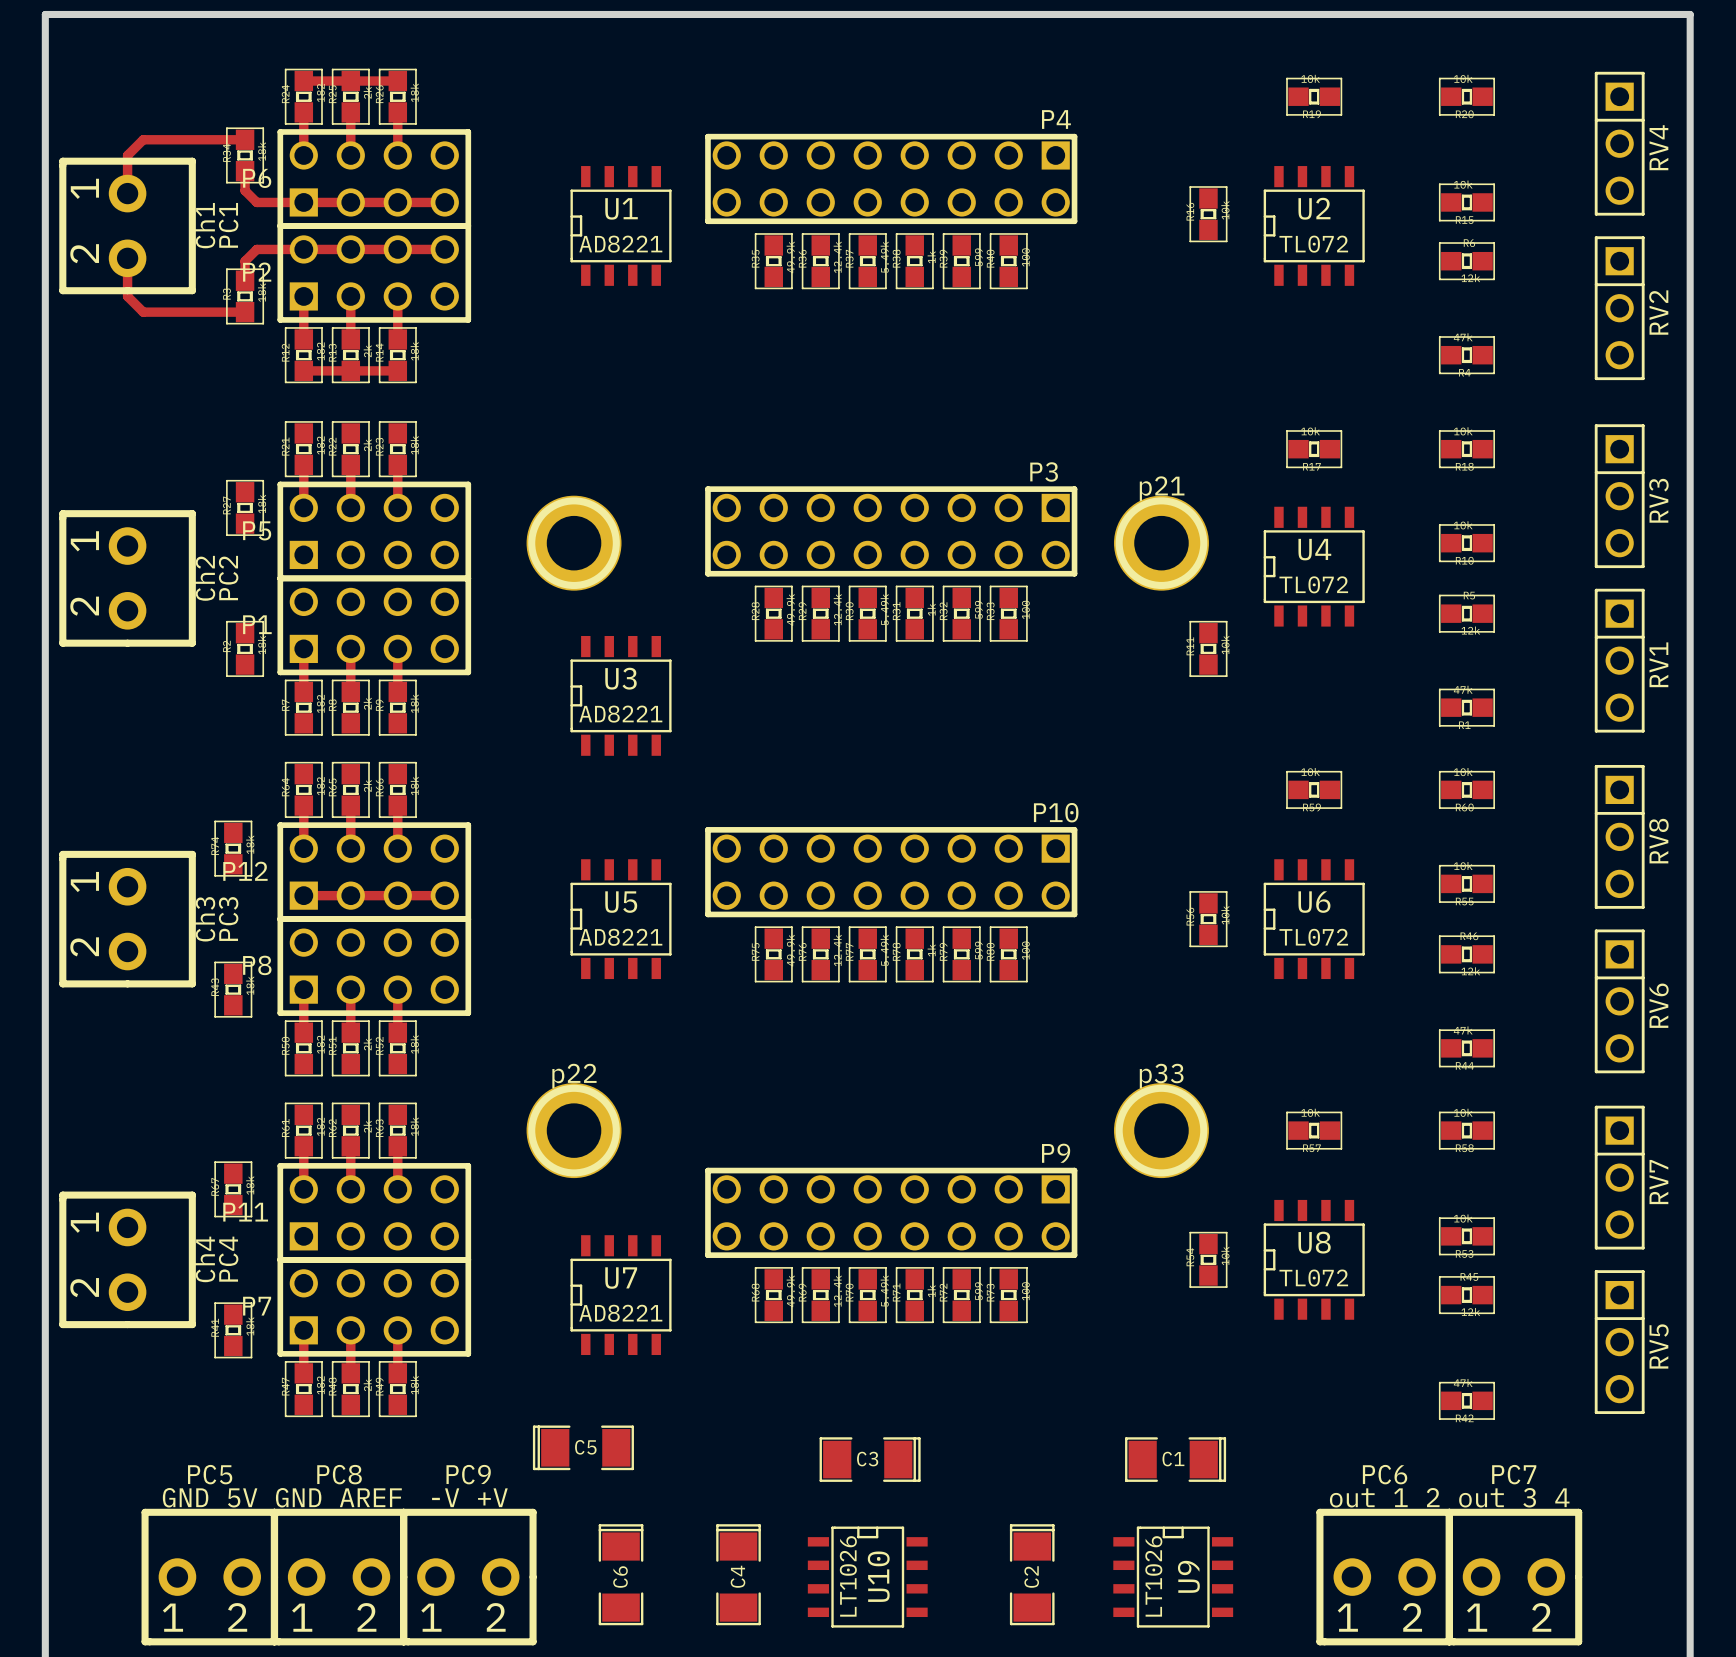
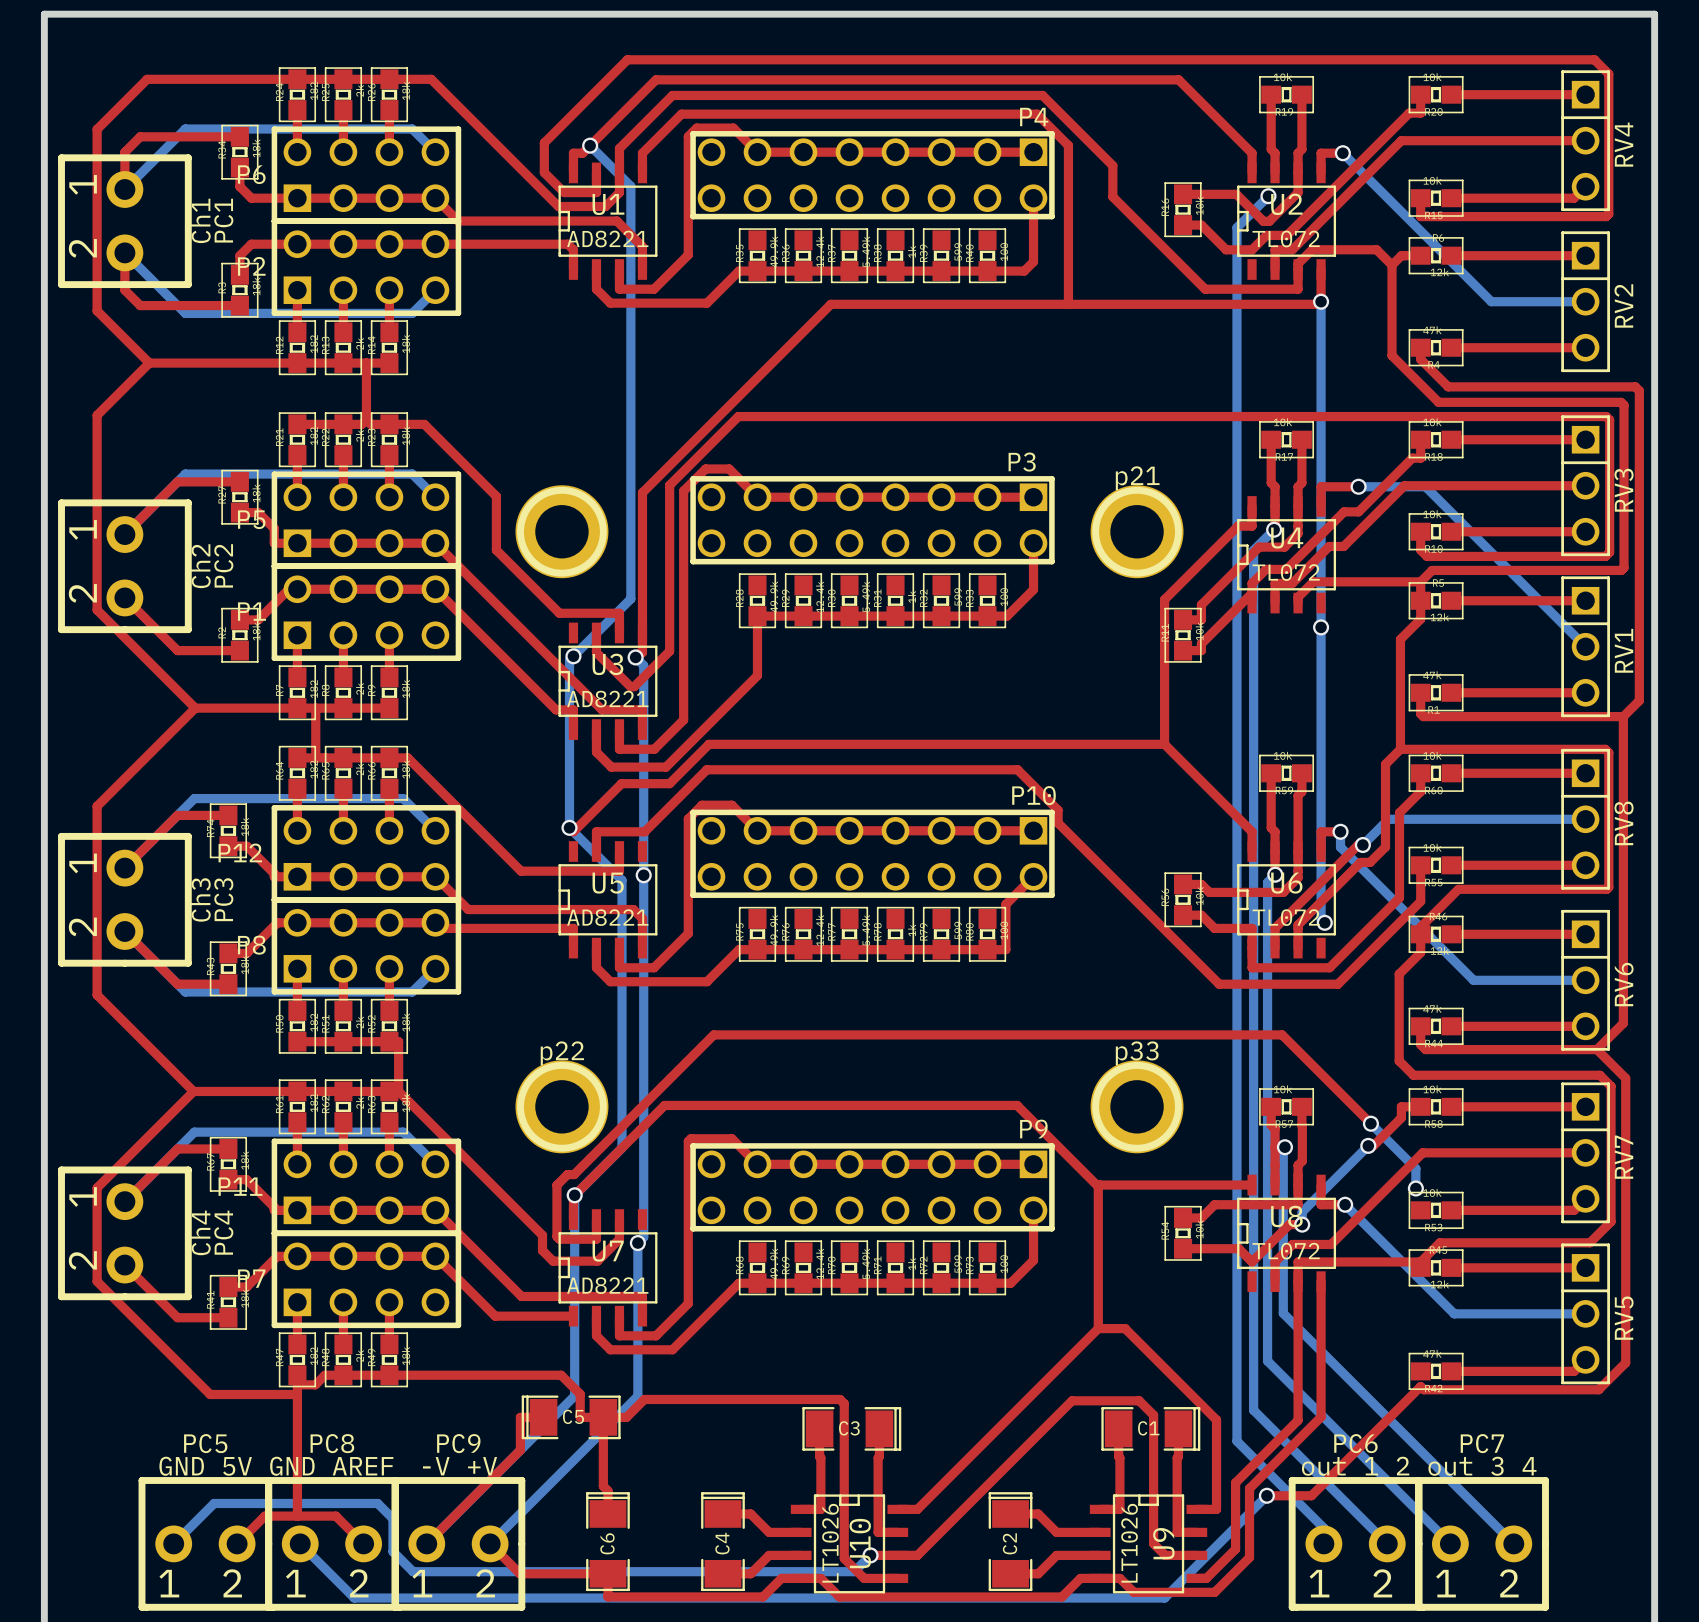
top track: none -> (297, 79) (147, 79) (97, 129) (97, 310) (149, 363)
top track: none -> (389, 79) (431, 79) (558, 206) (605, 206) (619, 192) (619, 148) (672, 95) (1042, 95) (1112, 165) (1112, 196) (1205, 289) (1298, 289) (1298, 263) (1312, 249) (1376, 249) (1392, 265)
top track: none -> (1271, 94) (1271, 149) (1275, 153) (1275, 172)
top track: none -> (1301, 94) (1301, 149) (1298, 153) (1298, 192) (1269, 221) (1263, 221) (1236, 194) (1183, 194)
top track: none -> (1420, 94) (1420, 113) (1409, 113) (1287, 235) (1266, 235) (1252, 249) (1226, 249) (1201, 225) (1183, 225)
top track: none -> (1451, 94) (1585, 94)
top track: none -> (1585, 140) (1401, 140) (1292, 249) (1275, 249) (1275, 269)
bottom track: none -> (590, 145) (630, 186) (630, 598) (569, 660) (569, 827) (621, 880) (621, 1148) (574, 1195) (574, 1395) (426, 1543)
via: none -> (590, 145)
bottom track: none -> (435, 152) (412, 129) (185, 129) (124, 189)
top track: none -> (1033, 152) (757, 152) (733, 128) (696, 128) (688, 136) (688, 254) (654, 289) (619, 289) (619, 269)
top track: none -> (1342, 153) (1321, 153) (1321, 172)
bottom track: none -> (1342, 153) (1491, 301) (1585, 301)
via: none -> (1342, 153)
top track: none -> (573, 172) (573, 153) (582, 153) (655, 79) (1178, 79) (1252, 153) (1252, 172)
top track: none -> (596, 172) (596, 192) (564, 192) (544, 172) (544, 142) (627, 59) (1594, 59) (1608, 74) (1608, 214) (1606, 216) (1420, 216) (1420, 198)
top track: none -> (642, 172) (642, 153) (681, 114) (1037, 114) (1068, 145) (1068, 304)
top track: none -> (1585, 186) (1574, 198) (1451, 198)
bottom track: none -> (1268, 196) (1236, 227) (1236, 1441) (1323, 1528) (1323, 1543)
via: none -> (1268, 196)
top track: none -> (435, 198) (458, 221) (616, 221) (642, 246) (642, 269)
top track: none -> (1033, 198) (1033, 261) (1024, 271) (739, 271) (707, 303) (610, 303) (596, 289) (596, 269)
top track: none -> (435, 244) (567, 244) (573, 249) (573, 269)
bottom track: none -> (124, 252) (185, 313) (412, 313) (435, 290)
top track: none -> (1420, 255) (1401, 255) (1392, 265)
top track: none -> (1451, 255) (1585, 255)
top track: none -> (1392, 265) (1392, 355) (1438, 402) (1621, 402) (1624, 405) (1624, 567) (1621, 570) (1432, 570) (1420, 581)
top track: none -> (1321, 269) (1321, 301) (1318, 304) (830, 304) (642, 492) (642, 652) (635, 657)
bottom track: none -> (1321, 301) (1321, 919) (1324, 922)
via: none -> (1321, 301)
top track: none -> (1420, 347) (1420, 359) (1448, 386) (1635, 386) (1639, 390) (1639, 700) (1623, 716)
top track: none -> (1451, 347) (1585, 347)
top track: none -> (149, 363) (297, 363)
top track: none -> (149, 363) (97, 415) (97, 609) (195, 708)
top track: none -> (366, 363) (366, 419)
top track: none -> (366, 419) (361, 424) (297, 424)
top track: none -> (366, 419) (371, 424) (424, 424) (496, 496) (496, 550) (559, 613) (619, 613) (619, 632)
top track: none -> (1271, 439) (1271, 482) (1275, 486) (1274, 529)
top track: none -> (1301, 439) (1301, 482) (1298, 486) (1298, 533) (1284, 547) (1259, 547) (1201, 604) (1201, 619) (1183, 619)
top track: none -> (1420, 439) (1420, 458) (1412, 458) (1358, 511) (1344, 511) (1286, 569) (1266, 569) (1252, 583) (1252, 603)
top track: none -> (1451, 439) (1585, 439)
top track: none -> (239, 481) (177, 481) (124, 534)
top track: none -> (1585, 485) (1404, 485) (1343, 546) (1329, 546) (1292, 583) (1275, 583) (1275, 603)
top track: none -> (1358, 486) (1321, 486) (1321, 506)
bottom track: none -> (1358, 486) (1425, 486) (1585, 646)
via: none -> (1358, 486)
bottom track: none -> (435, 497) (412, 474) (185, 474) (124, 534)
top track: none -> (1033, 497) (757, 497) (729, 468) (705, 468) (683, 490) (683, 719) (654, 749) (619, 749) (619, 729)
top track: none -> (1252, 506) (1252, 526) (1238, 526) (1164, 599) (1164, 744)
top track: none -> (239, 512) (258, 512) (274, 528) (274, 543) (435, 543) (602, 709) (642, 709) (642, 729)
bottom track: none -> (1274, 529) (1253, 550) (1253, 1410) (1387, 1543)
via: none -> (1274, 529)
top track: none -> (1420, 531) (1420, 550) (1427, 556) (1605, 556) (1609, 552) (1609, 420) (1606, 416) (738, 416) (669, 485) (669, 651) (634, 686) (630, 686) (596, 652) (596, 632)
top track: none -> (1451, 531) (1585, 531)
top track: none -> (1033, 543) (1033, 589) (1007, 616) (757, 616) (757, 675) (666, 767) (611, 767) (596, 752) (596, 729)
top track: none -> (1420, 581) (1420, 619) (1400, 639) (1400, 749)
top track: none -> (1420, 581) (1313, 581) (1298, 597) (1298, 603)
top track: none -> (1252, 593) (1201, 643) (1201, 650) (1183, 650)
top track: none -> (124, 597) (177, 650) (239, 650)
top track: none -> (1451, 600) (1585, 600)
top track: none -> (239, 619) (258, 619) (288, 589) (435, 589) (556, 709) (573, 709) (573, 729)
via: none -> (1321, 627)
via: none -> (573, 656)
bottom track: none -> (635, 657) (643, 665) (643, 1237) (637, 1243) (637, 1396) (490, 1543)
via: none -> (635, 657)
top track: none -> (1420, 692) (1420, 713) (1423, 716) (1623, 716)
top track: none -> (1451, 692) (1585, 692)
top track: none -> (195, 708) (389, 708)
top track: none -> (195, 708) (97, 806) (97, 994) (193, 1091)
top track: none -> (315, 708) (315, 757)
top track: none -> (1623, 716) (1623, 1023) (1597, 1049)
top track: none -> (1164, 744) (1252, 831) (1252, 851)
top track: none -> (1164, 744) (708, 744) (669, 783) (621, 783) (573, 831) (569, 827)
top track: none -> (1400, 749) (1385, 764) (1385, 846) (1370, 862) (1360, 862) (1298, 924) (1298, 948)
top track: none -> (1400, 749) (1605, 749) (1608, 752) (1608, 887) (1606, 889) (1458, 889) (1420, 927) (1420, 952) (1399, 974) (1399, 1060) (1413, 1075) (1599, 1075) (1611, 1086) (1611, 1221) (1589, 1242) (1439, 1242) (1420, 1261)
top track: none -> (297, 757) (407, 757) (521, 871) (619, 871) (619, 851)
top track: none -> (1271, 773) (1271, 827) (1275, 831) (1275, 874)
top track: none -> (1301, 773) (1301, 791) (1298, 795) (1298, 877) (1283, 892) (1209, 892) (1201, 884) (1183, 884)
top track: none -> (1420, 773) (1420, 791) (1399, 812) (1399, 897) (1329, 967) (1252, 967) (1252, 928) (1214, 928) (1201, 915) (1183, 915)
top track: none -> (1451, 773) (1585, 773)
top track: none -> (228, 815) (177, 815) (124, 868)
bottom track: none -> (1585, 819) (1388, 819) (1362, 845)
via: none -> (569, 827)
bottom track: none -> (435, 830) (403, 798) (194, 798) (124, 868)
top track: none -> (1033, 830) (757, 830) (731, 805) (702, 805) (688, 819) (688, 933) (654, 967) (619, 967) (619, 948)
top track: none -> (1340, 831) (1321, 831) (1321, 851)
bottom track: none -> (1340, 831) (1340, 847) (1473, 980) (1585, 980)
via: none -> (1340, 831)
top track: none -> (1362, 845) (1358, 845) (1275, 928) (1275, 948)
via: none -> (1362, 845)
top track: none -> (228, 846) (246, 846) (274, 873) (274, 876) (297, 876)
top track: none -> (596, 851) (596, 831) (644, 831) (706, 769) (1017, 769) (1058, 810) (1058, 822) (1219, 984) (1337, 984) (1420, 901) (1420, 865)
top track: none -> (1451, 865) (1585, 865)
bottom track: none -> (1275, 874) (1267, 882) (1267, 1361) (1450, 1543)
via: none -> (1275, 874)
via: none -> (643, 875)
top track: none -> (435, 876) (468, 909) (633, 909) (642, 918) (642, 948)
top track: none -> (1033, 876) (1005, 904) (1005, 949) (739, 949) (707, 981) (610, 981) (596, 967) (596, 948)
via: none -> (1324, 922)
top track: none -> (124, 931) (177, 984) (228, 984)
bottom track: none -> (124, 931) (185, 991) (412, 991) (435, 968)
top track: none -> (1451, 934) (1585, 934)
top track: none -> (573, 948) (573, 928) (441, 928) (435, 922) (277, 922) (246, 953) (228, 953)
top track: none -> (1420, 1026) (1420, 1044) (1425, 1049) (1597, 1049)
top track: none -> (1451, 1026) (1585, 1026)
top track: none -> (297, 1041) (398, 1041) (398, 1091)
top track: none -> (1597, 1049) (1625, 1078) (1625, 1362) (1598, 1389) (1423, 1389) (1420, 1386) (1311, 1495) (1266, 1495)
top track: none -> (193, 1091) (398, 1091)
top track: none -> (193, 1091) (97, 1187) (97, 1281) (210, 1394) (297, 1394)
top track: none -> (398, 1091) (542, 1235) (542, 1250) (553, 1261) (597, 1261) (619, 1239) (619, 1219)
top track: none -> (1271, 1106) (1271, 1125) (1275, 1129) (1275, 1185)
top track: none -> (1301, 1106) (1302, 1161) (1298, 1165) (1298, 1204) (1214, 1204) (1201, 1217) (1183, 1217)
top track: none -> (1420, 1106) (1401, 1106) (1401, 1117) (1373, 1145) (1368, 1145)
top track: none -> (1451, 1106) (1585, 1106)
top track: none -> (1370, 1123) (1282, 1034) (713, 1034) (574, 1174) (567, 1174) (556, 1185) (556, 1236) (559, 1239) (596, 1239) (596, 1219)
bottom track: none -> (1370, 1123) (1415, 1168) (1415, 1188)
via: none -> (1370, 1123)
bottom track: none -> (1368, 1145) (1302, 1212) (1302, 1224)
via: none -> (1368, 1145)
bottom track: none -> (1284, 1147) (1283, 1148) (1283, 1313) (1513, 1543)
via: none -> (1284, 1147)
top track: none -> (228, 1148) (177, 1148) (124, 1201)
top track: none -> (1585, 1152) (1422, 1152) (1331, 1244) (1292, 1244) (1275, 1261) (1275, 1281)
bottom track: none -> (435, 1164) (403, 1132) (194, 1132) (124, 1201)
top track: none -> (1033, 1164) (757, 1164) (731, 1138) (690, 1138) (688, 1141) (688, 1303) (656, 1335) (619, 1335) (619, 1316)
top track: none -> (228, 1179) (246, 1179) (274, 1207) (274, 1210) (435, 1210) (521, 1296) (642, 1296) (642, 1316)
top track: none -> (1252, 1185) (1099, 1185) (1098, 1186)
top track: none -> (1321, 1185) (1321, 1204) (1345, 1204)
top track: none -> (1098, 1186) (1098, 1328)
top track: none -> (1098, 1186) (1017, 1105) (664, 1105) (574, 1195) (573, 1219)
via: none -> (1415, 1188)
via: none -> (574, 1195)
top track: none -> (1585, 1198) (1574, 1210) (1451, 1210)
bottom track: none -> (1345, 1204) (1454, 1313) (1585, 1313)
via: none -> (1345, 1204)
top track: none -> (1033, 1210) (1033, 1260) (1010, 1283) (739, 1283) (672, 1349) (610, 1349) (596, 1335) (596, 1316)
top track: none -> (1302, 1224) (1289, 1224) (1252, 1261) (1238, 1248) (1183, 1248)
via: none -> (1302, 1224)
via: none -> (637, 1243)
top track: none -> (1420, 1261) (1298, 1261) (1298, 1420) (1235, 1482) (1235, 1549) (1206, 1578) (1196, 1578)
top track: none -> (124, 1265) (177, 1317) (228, 1317)
top track: none -> (1451, 1267) (1585, 1267)
top track: none -> (1321, 1281) (1321, 1417) (1249, 1488) (1249, 1557) (1214, 1592) (1133, 1592) (1119, 1578) (1080, 1578) (1061, 1596) (839, 1596) (820, 1578) (781, 1578) (762, 1596) (607, 1596) (607, 1573) (520, 1573) (490, 1543)
top track: none -> (228, 1286) (246, 1286) (277, 1256) (435, 1256) (495, 1316) (573, 1316)
top track: none -> (1098, 1328) (1125, 1328) (1216, 1419) (1216, 1509) (1196, 1509)
top track: none -> (1098, 1328) (917, 1509) (897, 1509)
top track: none -> (1585, 1359) (1574, 1371) (1451, 1371)
top track: none -> (297, 1375) (297, 1516)
top track: none -> (297, 1384) (315, 1384) (325, 1375) (561, 1375) (580, 1394) (580, 1417) (626, 1417) (644, 1399) (840, 1399) (844, 1403) (844, 1558) (864, 1578) (897, 1578)
top track: none -> (543, 1417) (520, 1417) (520, 1450) (426, 1543)
top track: none -> (603, 1417) (603, 1486) (607, 1490) (607, 1513)
top track: none -> (819, 1428) (820, 1509) (801, 1509)
top track: none -> (879, 1428) (878, 1532) (897, 1532)
top track: none -> (1118, 1428) (1119, 1509) (1100, 1509)
top track: none -> (1178, 1428) (1177, 1532) (1196, 1532)
bottom track: none -> (1266, 1495) (1164, 1598) (354, 1598) (300, 1543)
via: none -> (1266, 1495)
top track: none -> (722, 1513) (750, 1513) (769, 1532) (801, 1532)
top track: none -> (1010, 1513) (1038, 1513) (1056, 1532) (1100, 1532)
bottom track: none -> (173, 1543) (214, 1503) (377, 1503) (392, 1518) (392, 1551) (413, 1571) (854, 1571) (870, 1555)
top track: none -> (237, 1543) (264, 1516) (335, 1516) (363, 1543)
top track: none -> (801, 1555) (769, 1555) (750, 1573) (722, 1573)
top track: none -> (870, 1555) (917, 1555) (1072, 1400) (1139, 1400) (1153, 1415) (1153, 1543) (1165, 1555) (1196, 1555)
via: none -> (870, 1555)
top track: none -> (1100, 1555) (1056, 1555) (1038, 1573) (1010, 1573)

